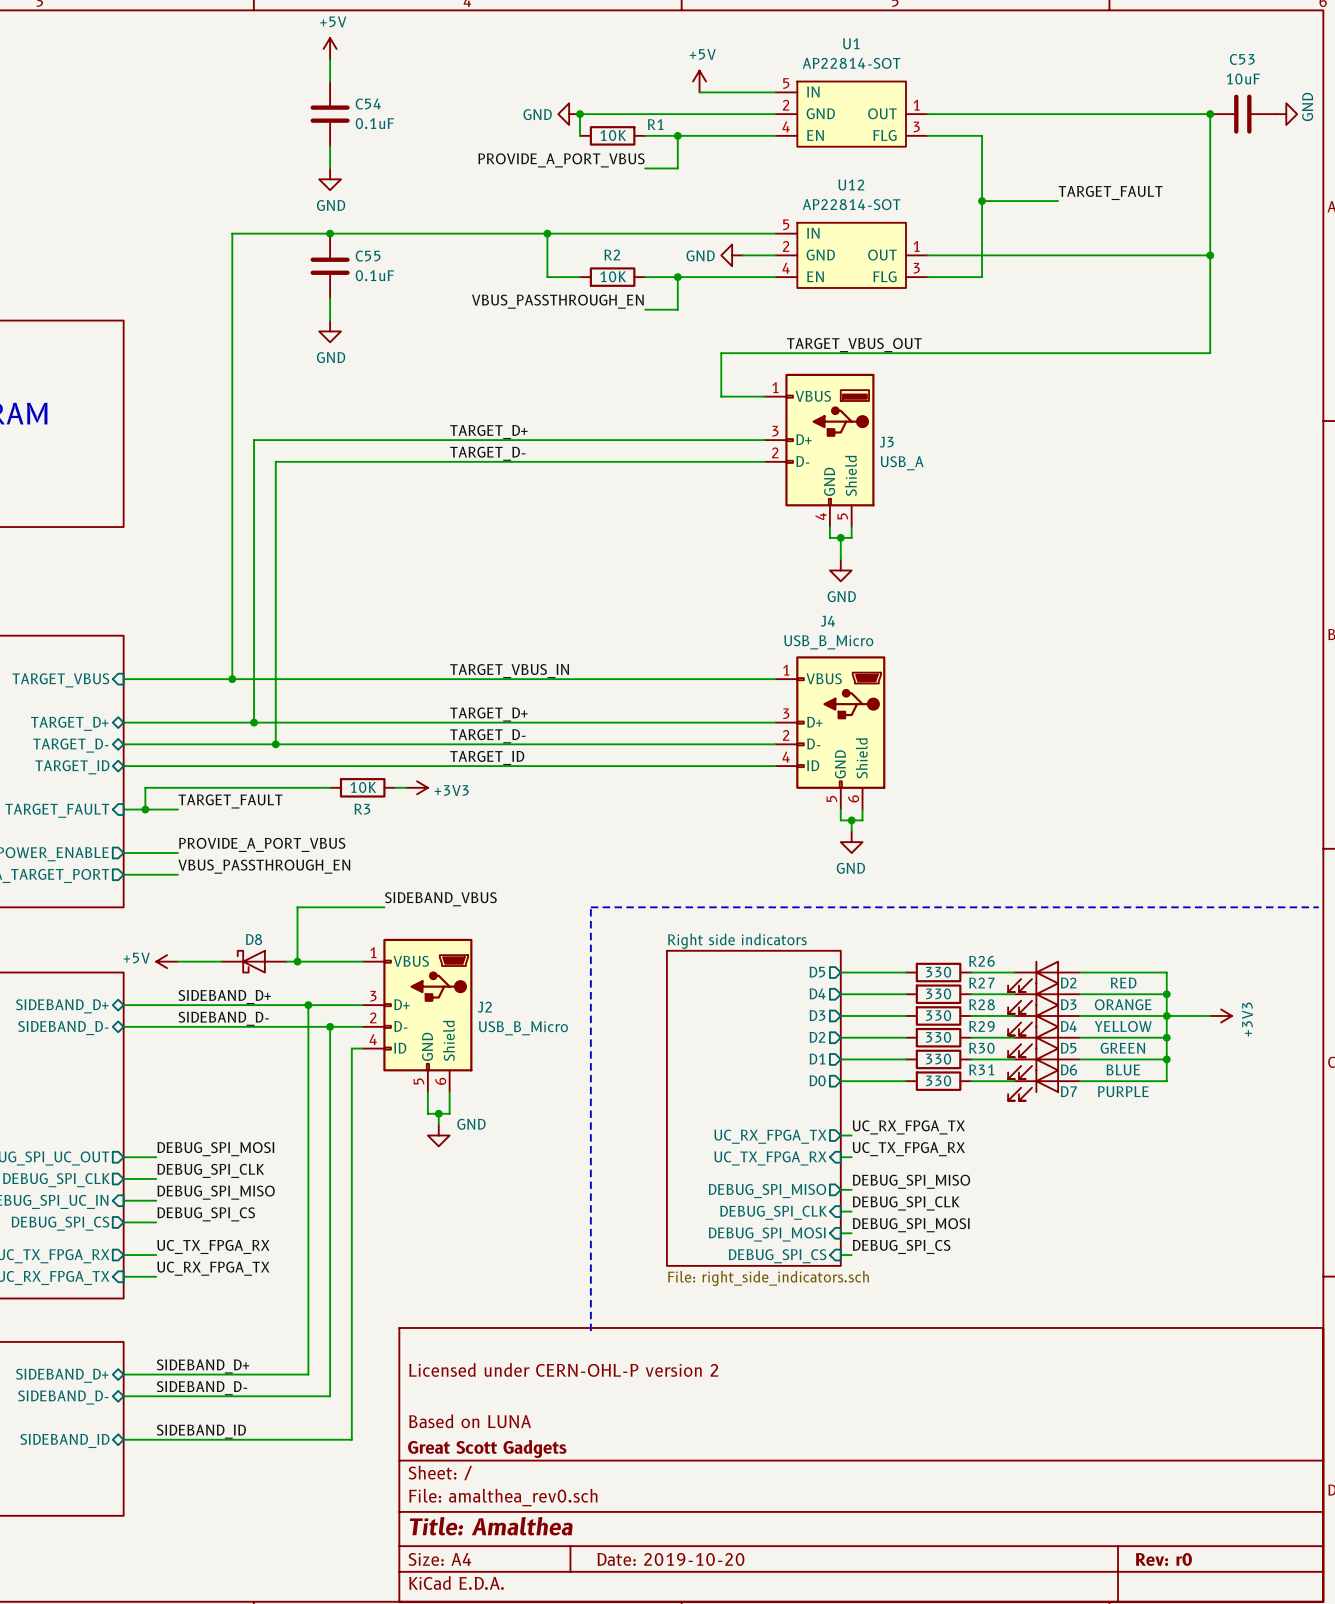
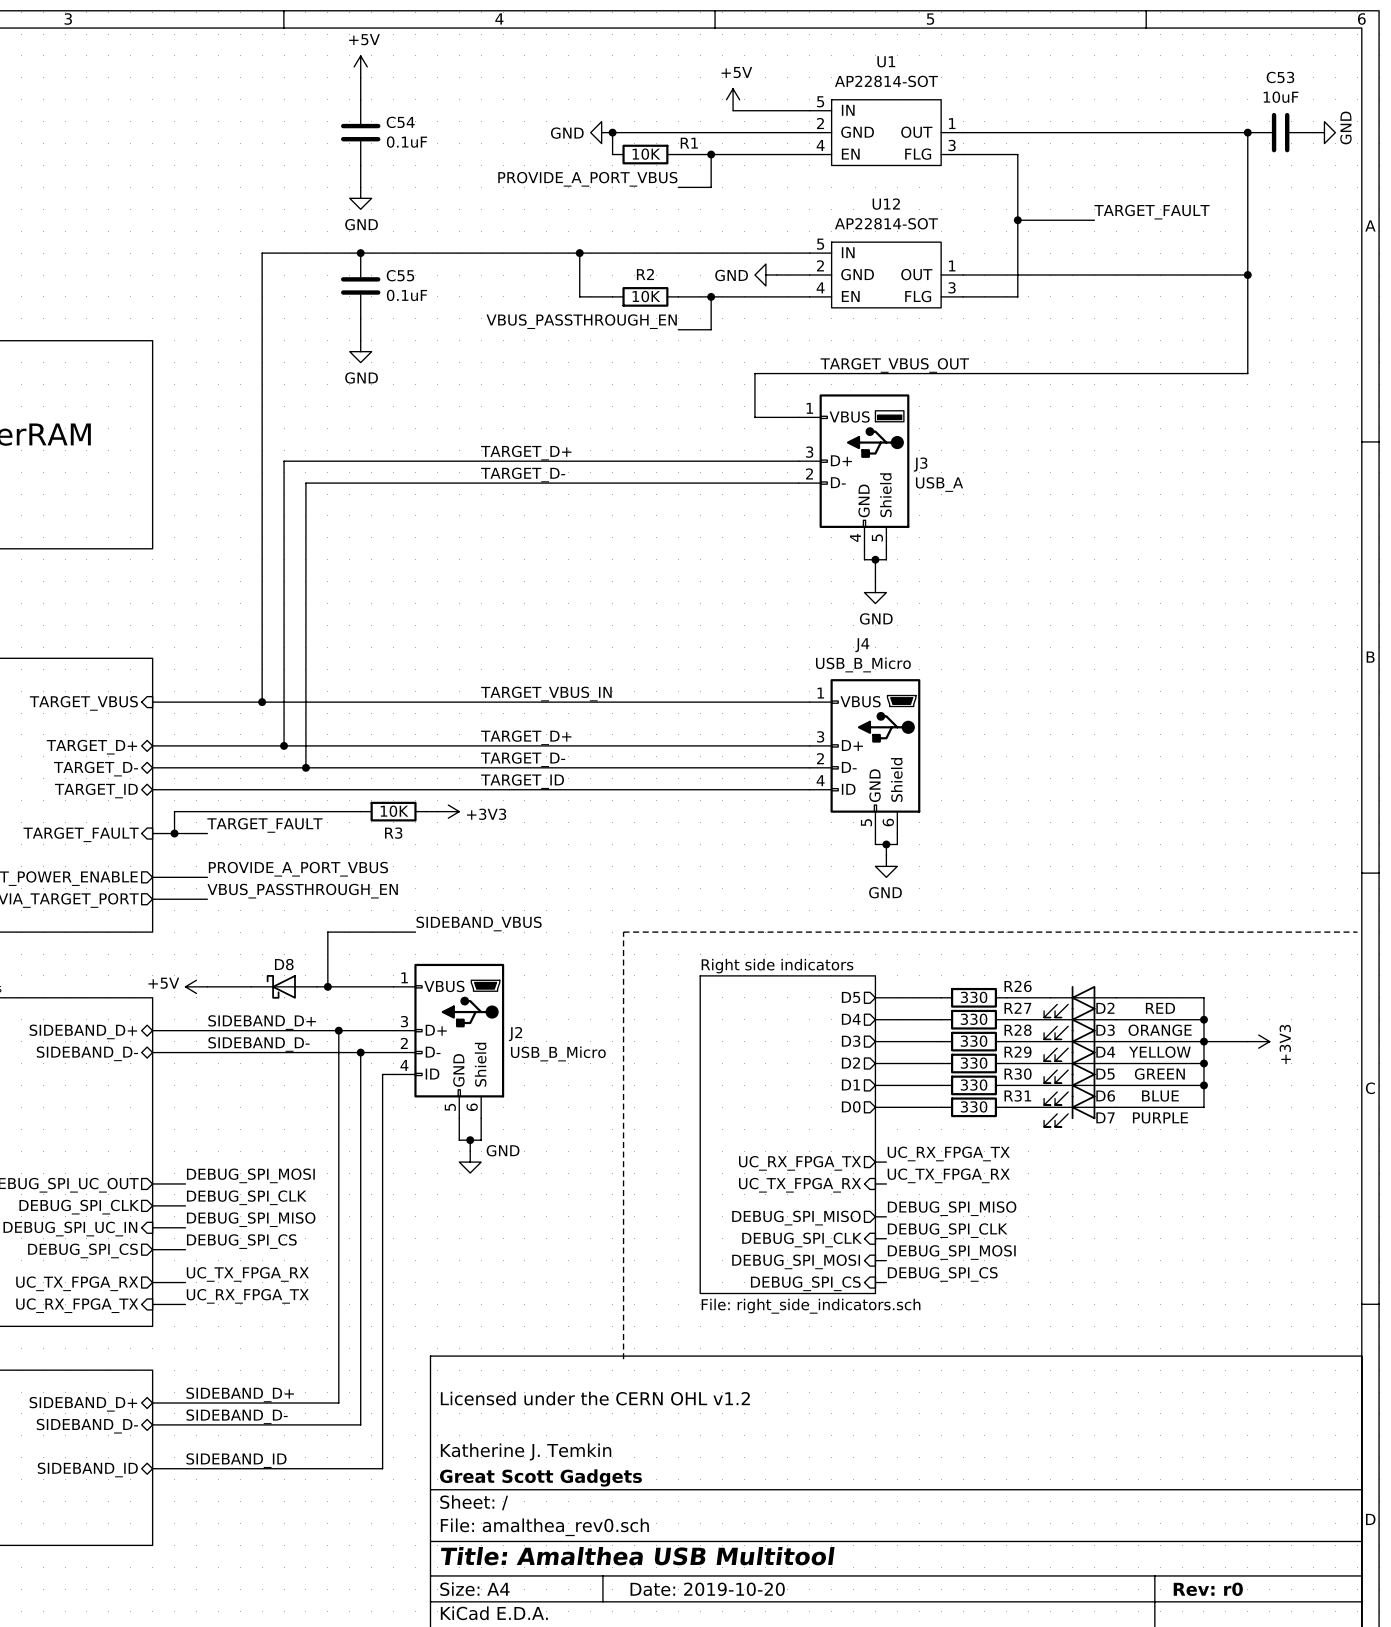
title block: Licensed under CERN-OHL-P version 2 (563, 1369) -> Licensed under the CERN OHL v1.2 (595, 1398)
title block: Based on LUNA (470, 1421) -> Katherine J. Temkin (526, 1451)
title block: Title: Amalthea (491, 1526) -> Title: Amalthea USB Multitool (637, 1556)

